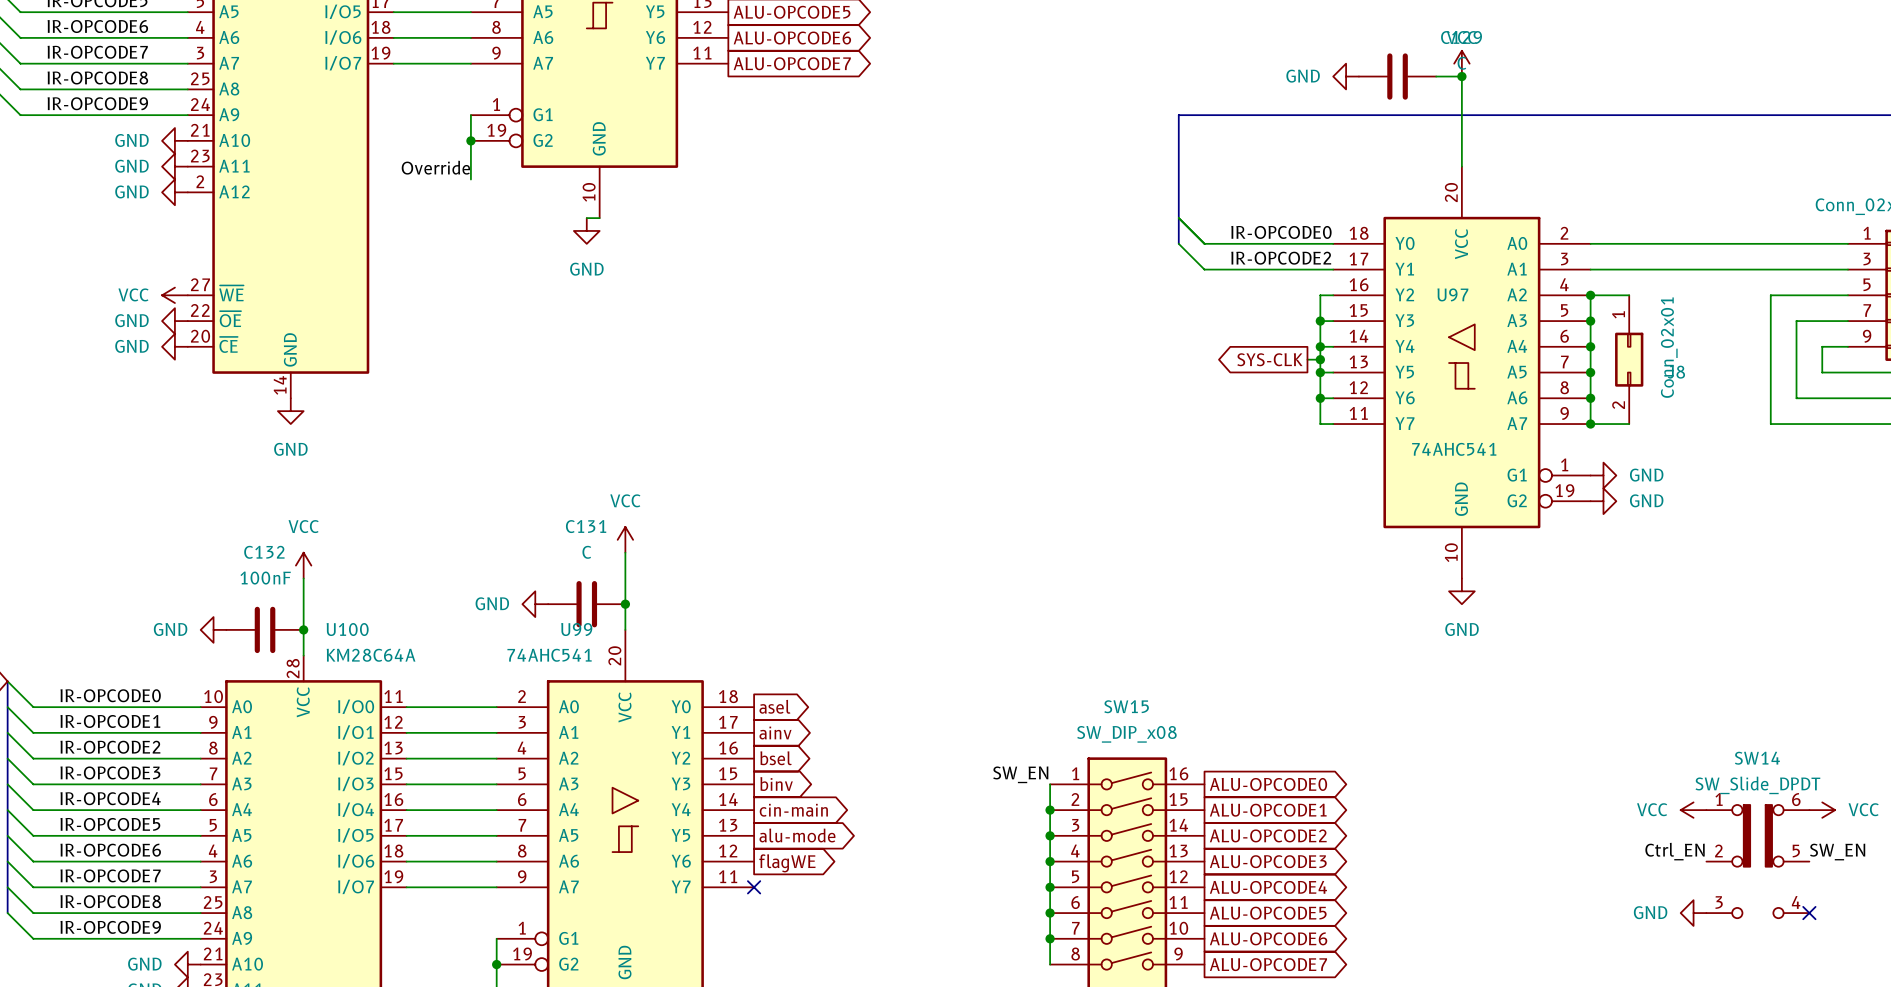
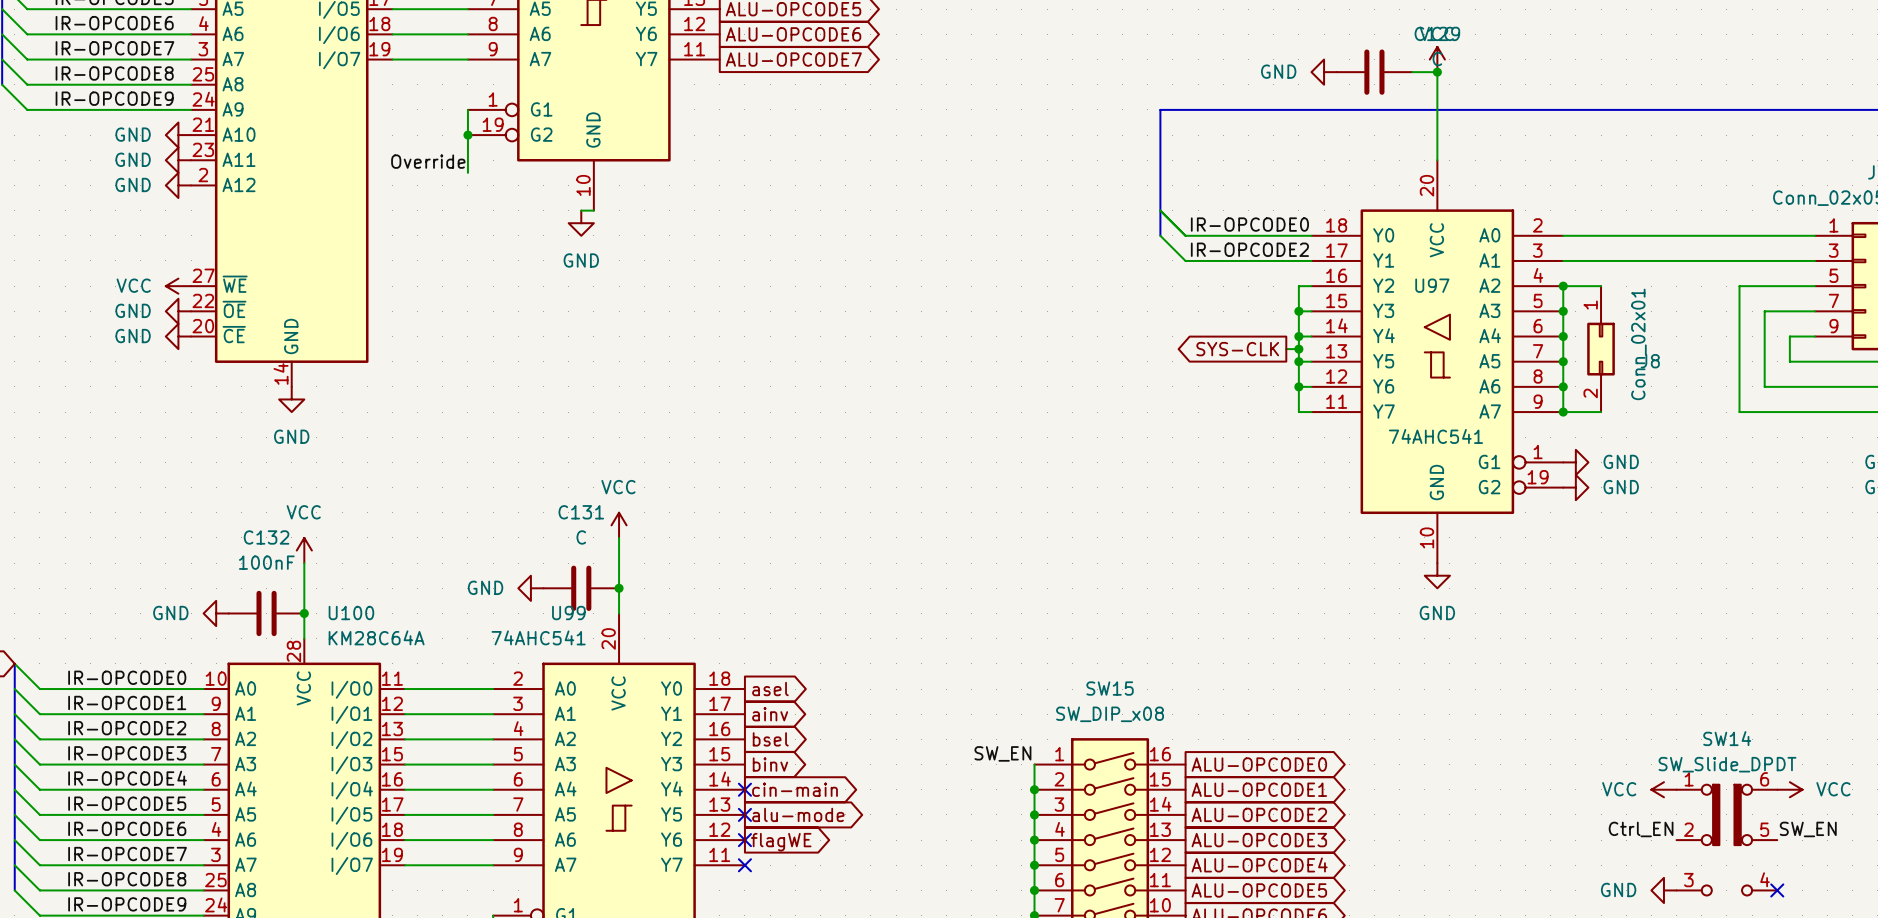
no-connect mark: none -> (744, 789)
no-connect mark: none -> (744, 814)
no-connect mark: none -> (744, 840)

